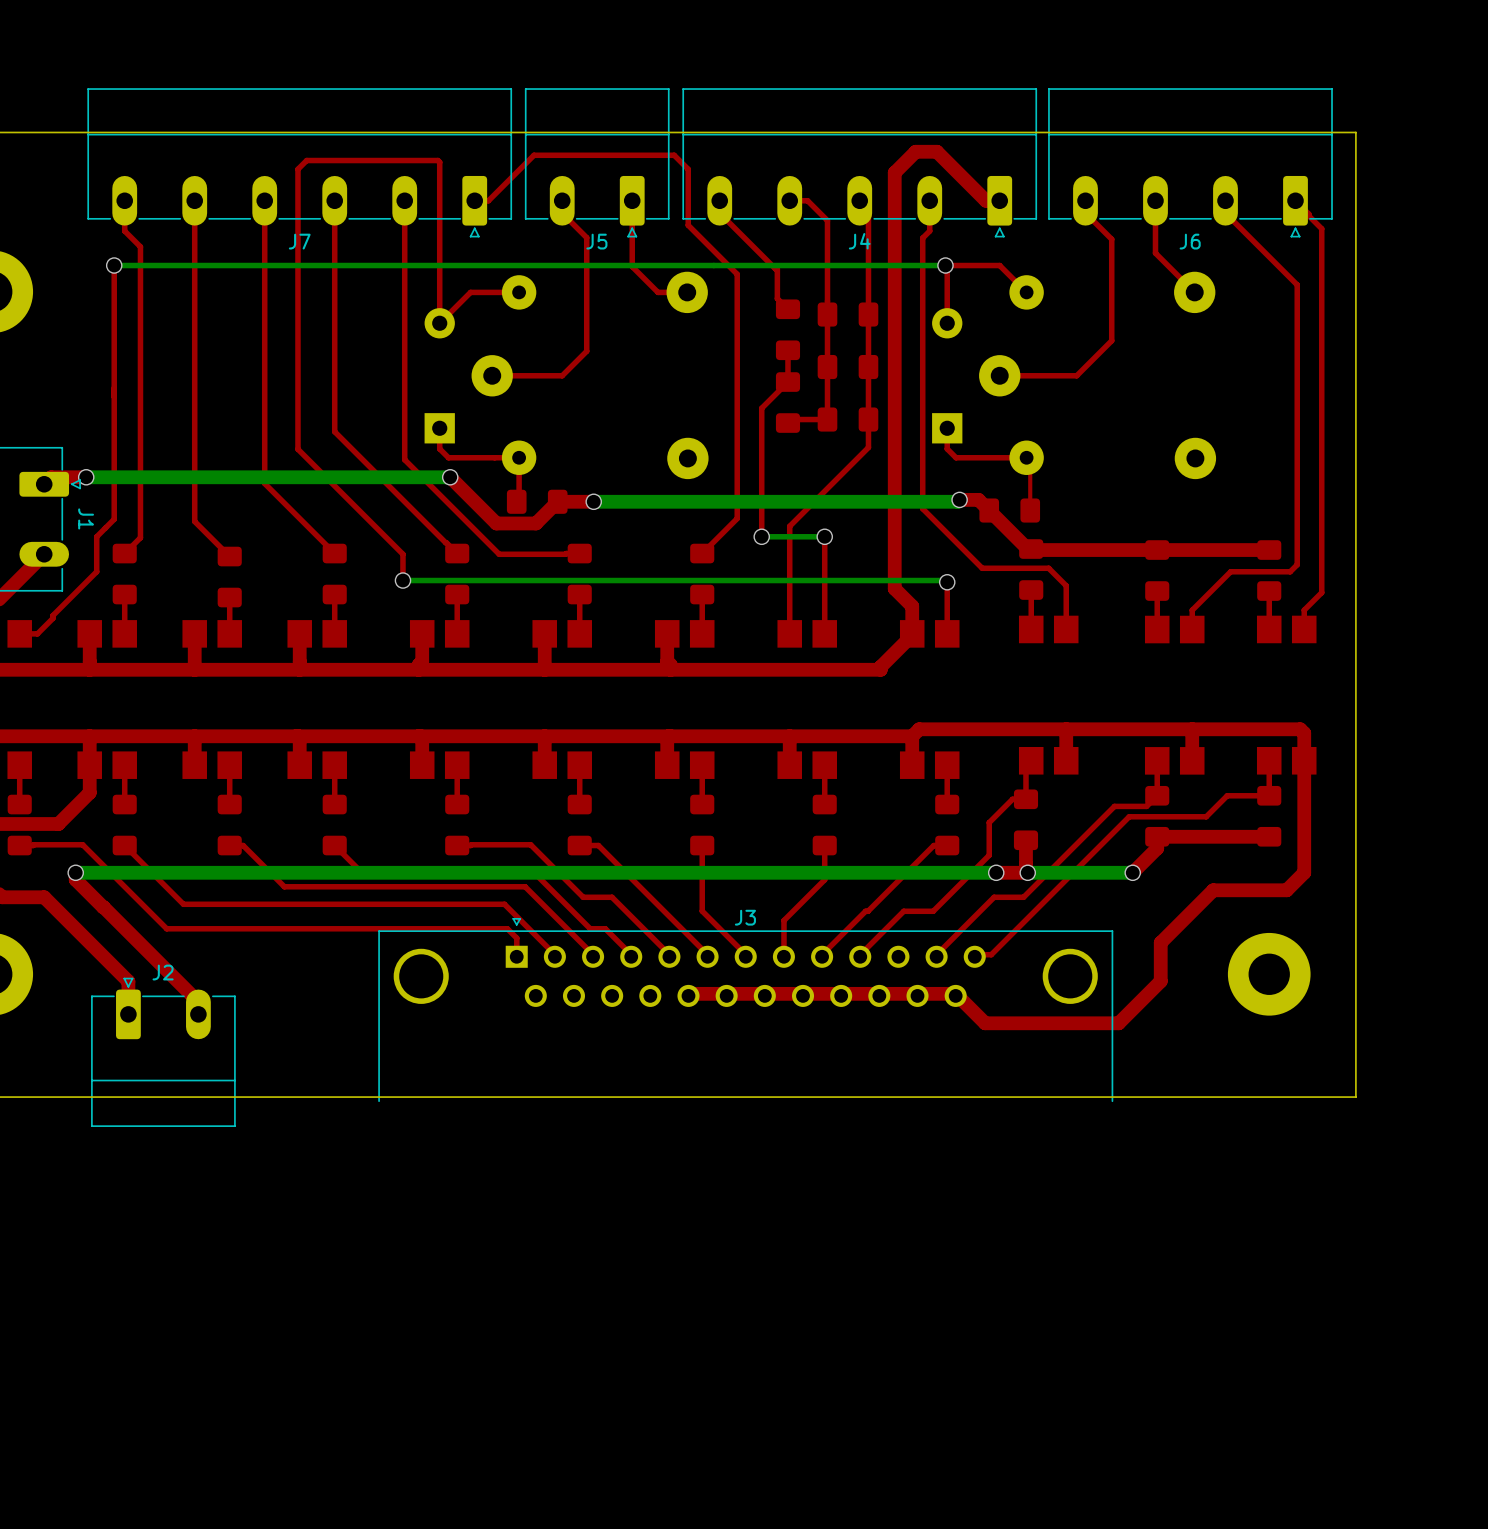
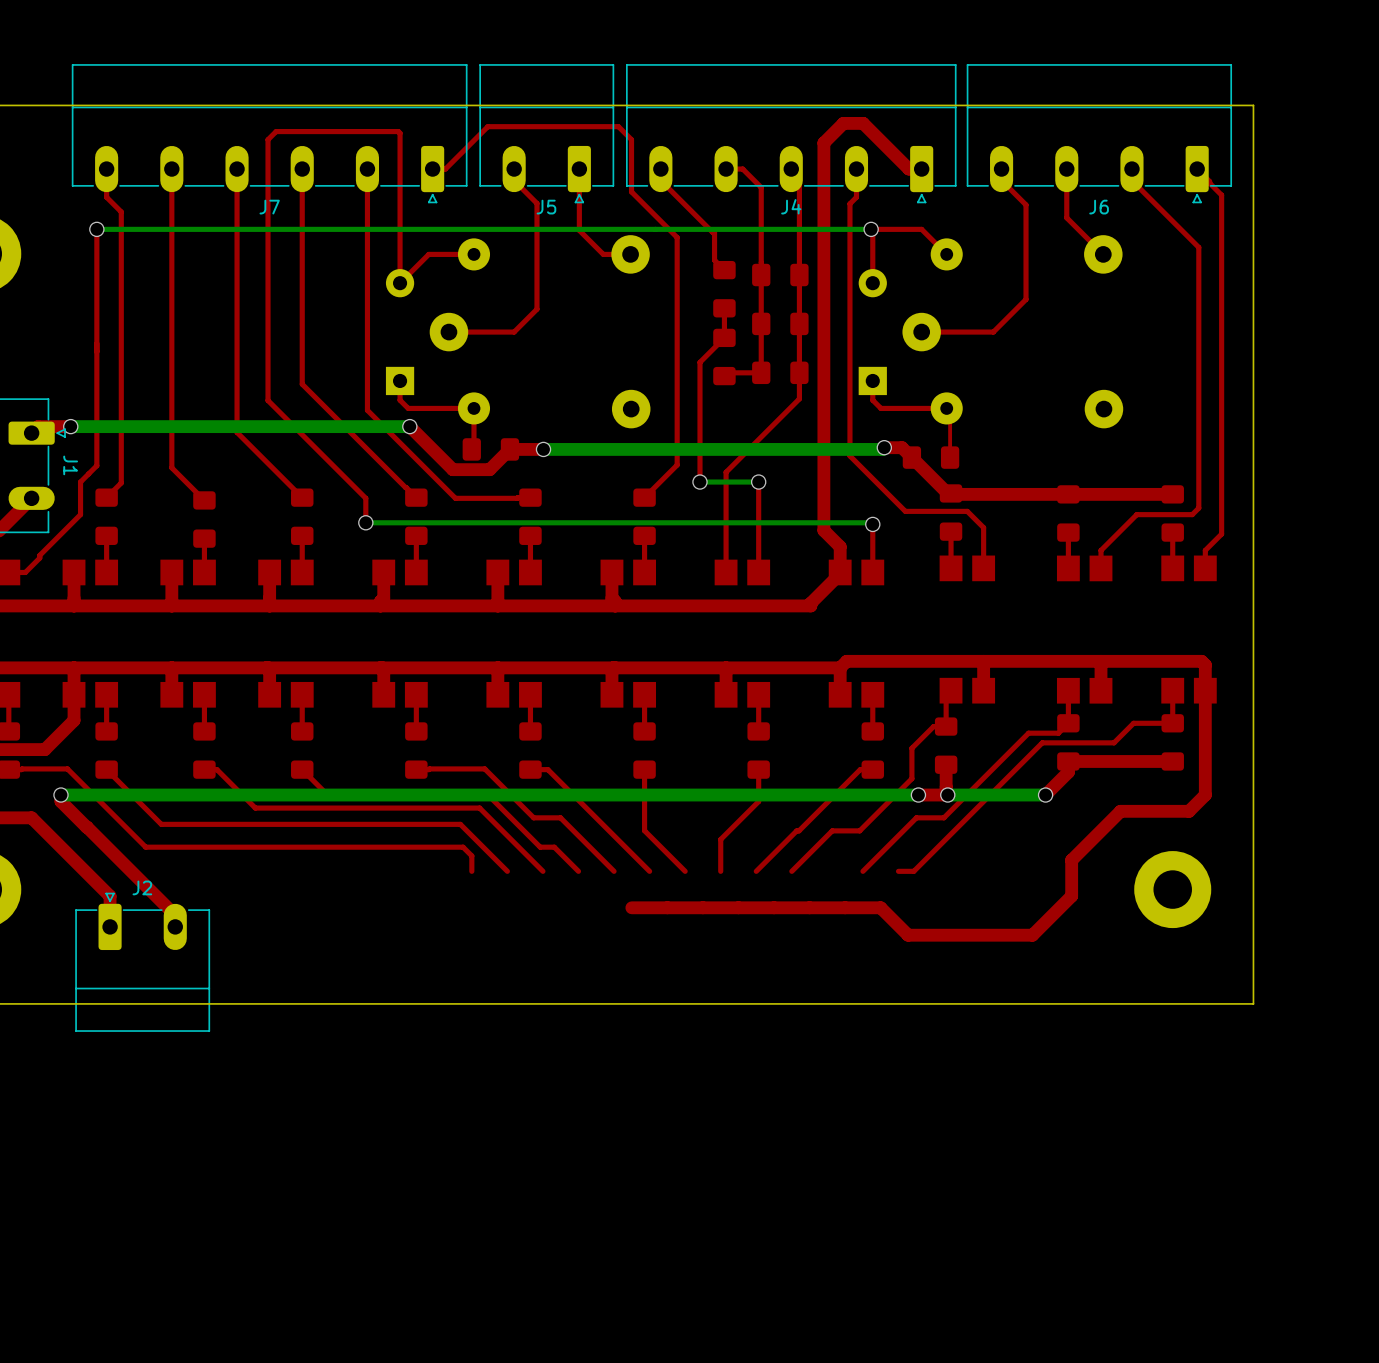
J3: (745, 1010) -> none

